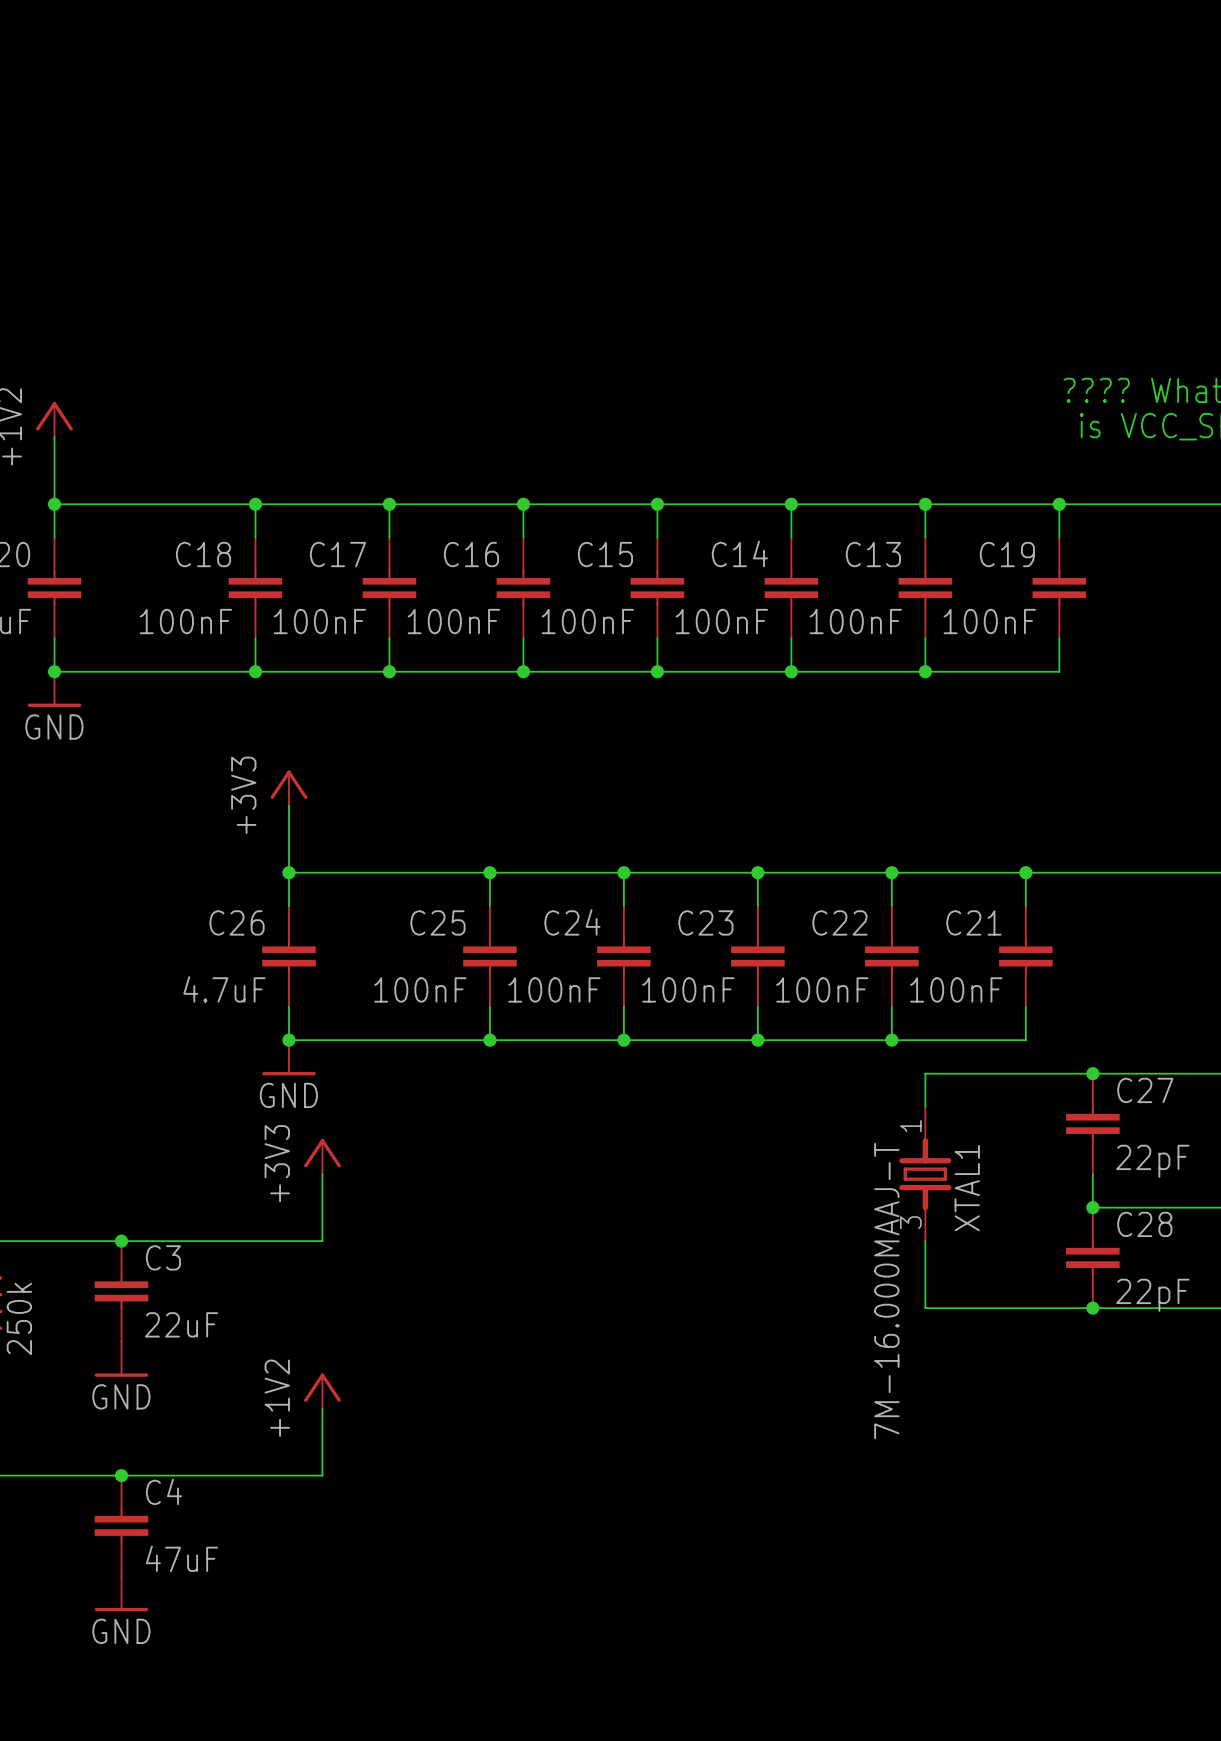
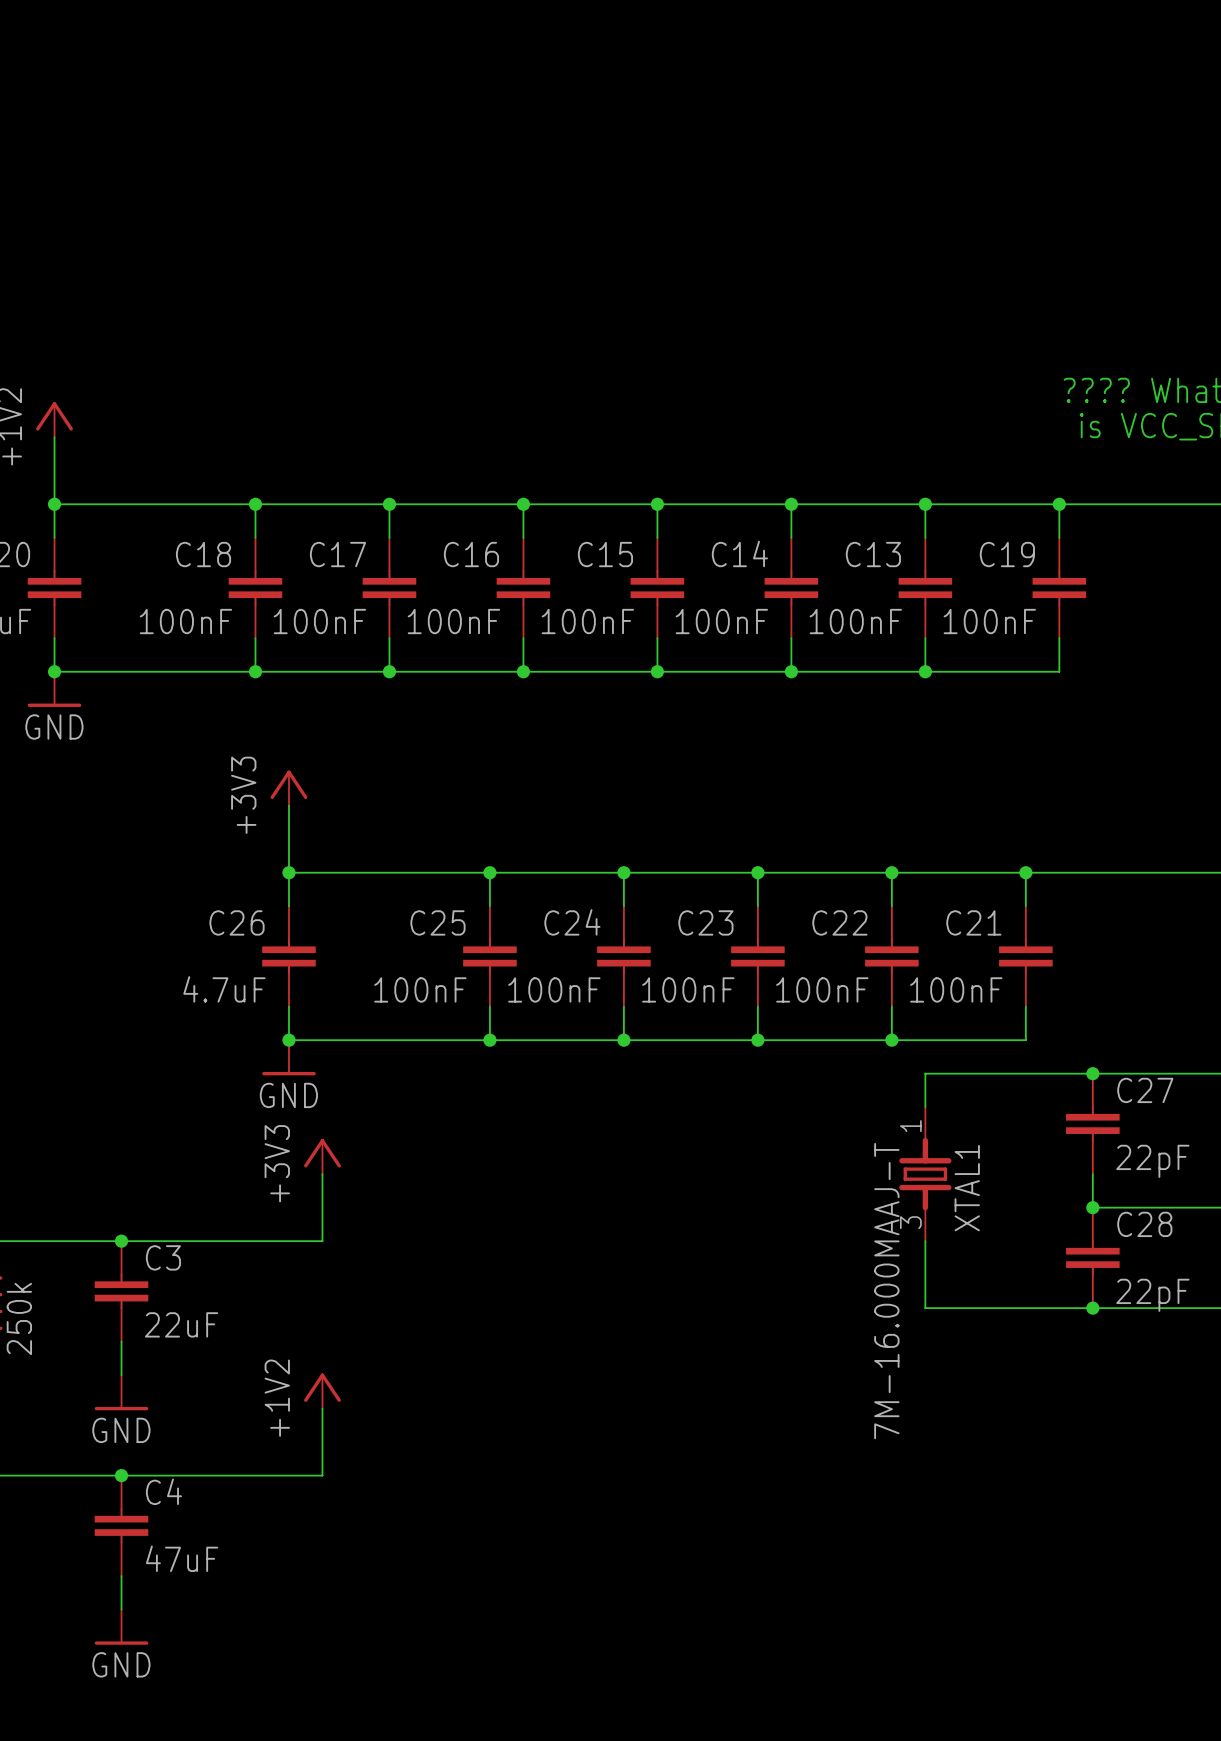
power symbol position: GND (121, 1359) -> GND (121, 1392)
power symbol position: GND (121, 1593) -> GND (121, 1627)

